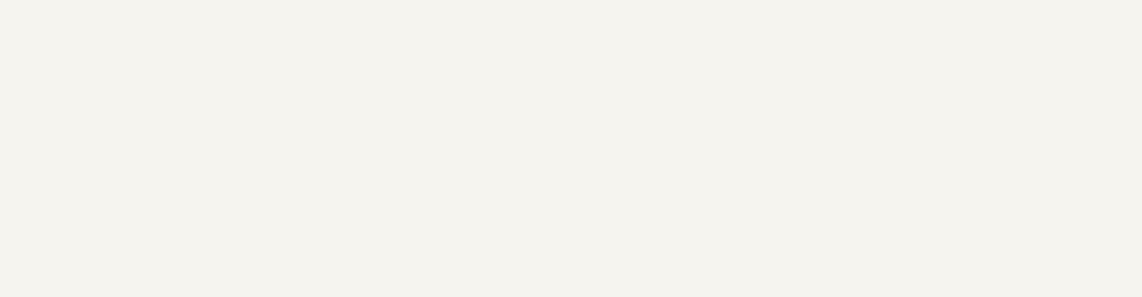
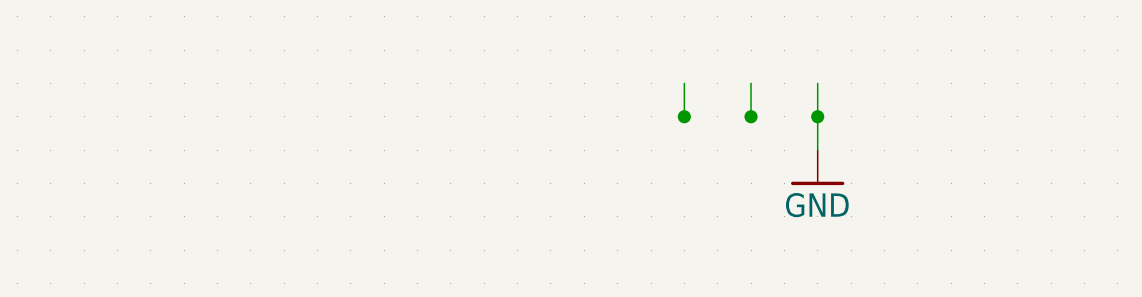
wire: none -> (684, 83) (684, 116)
wire: none -> (751, 83) (751, 116)
wire: none -> (817, 83) (817, 150)
junction: none -> (684, 116)
junction: none -> (751, 116)
junction: none -> (817, 116)
power symbol: none -> GND (817, 167)

